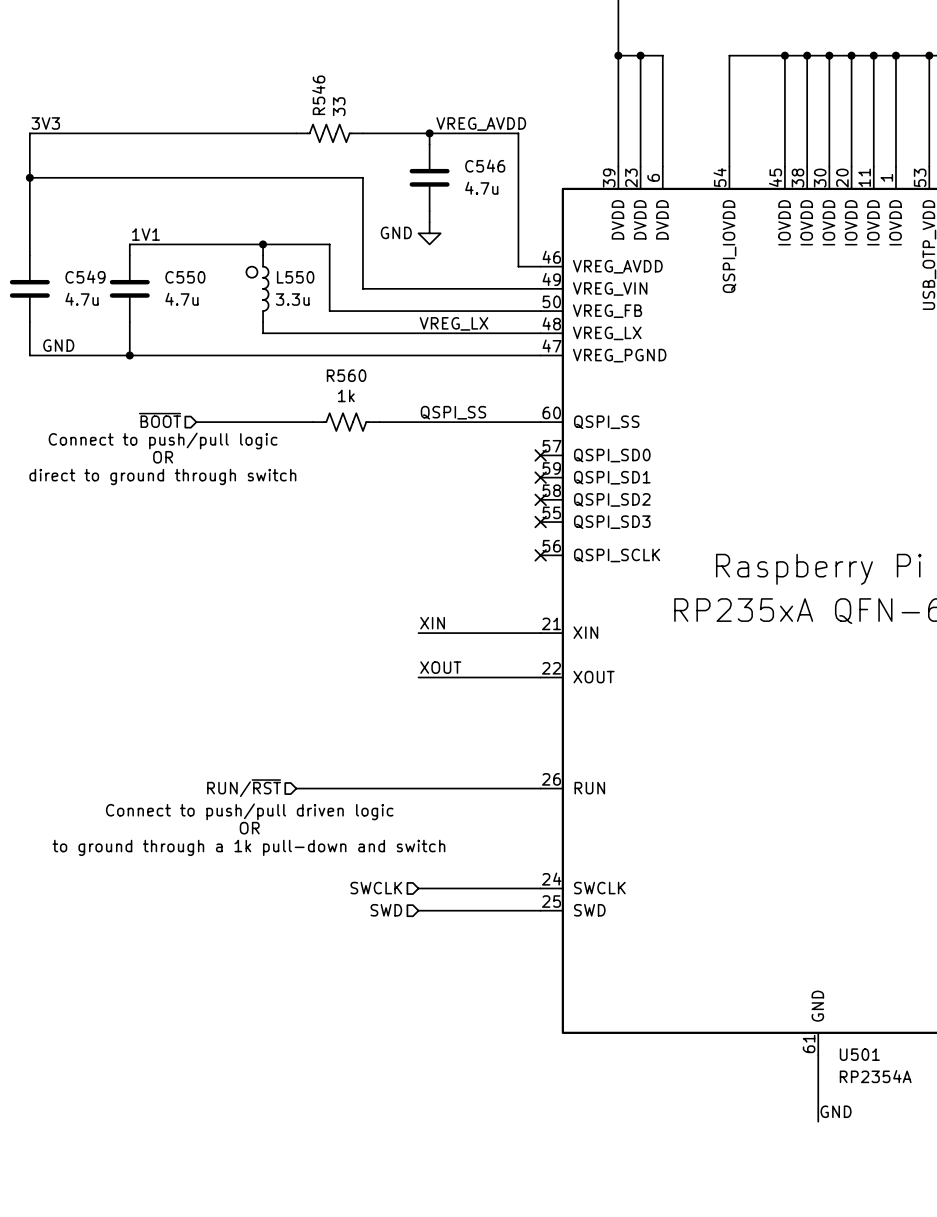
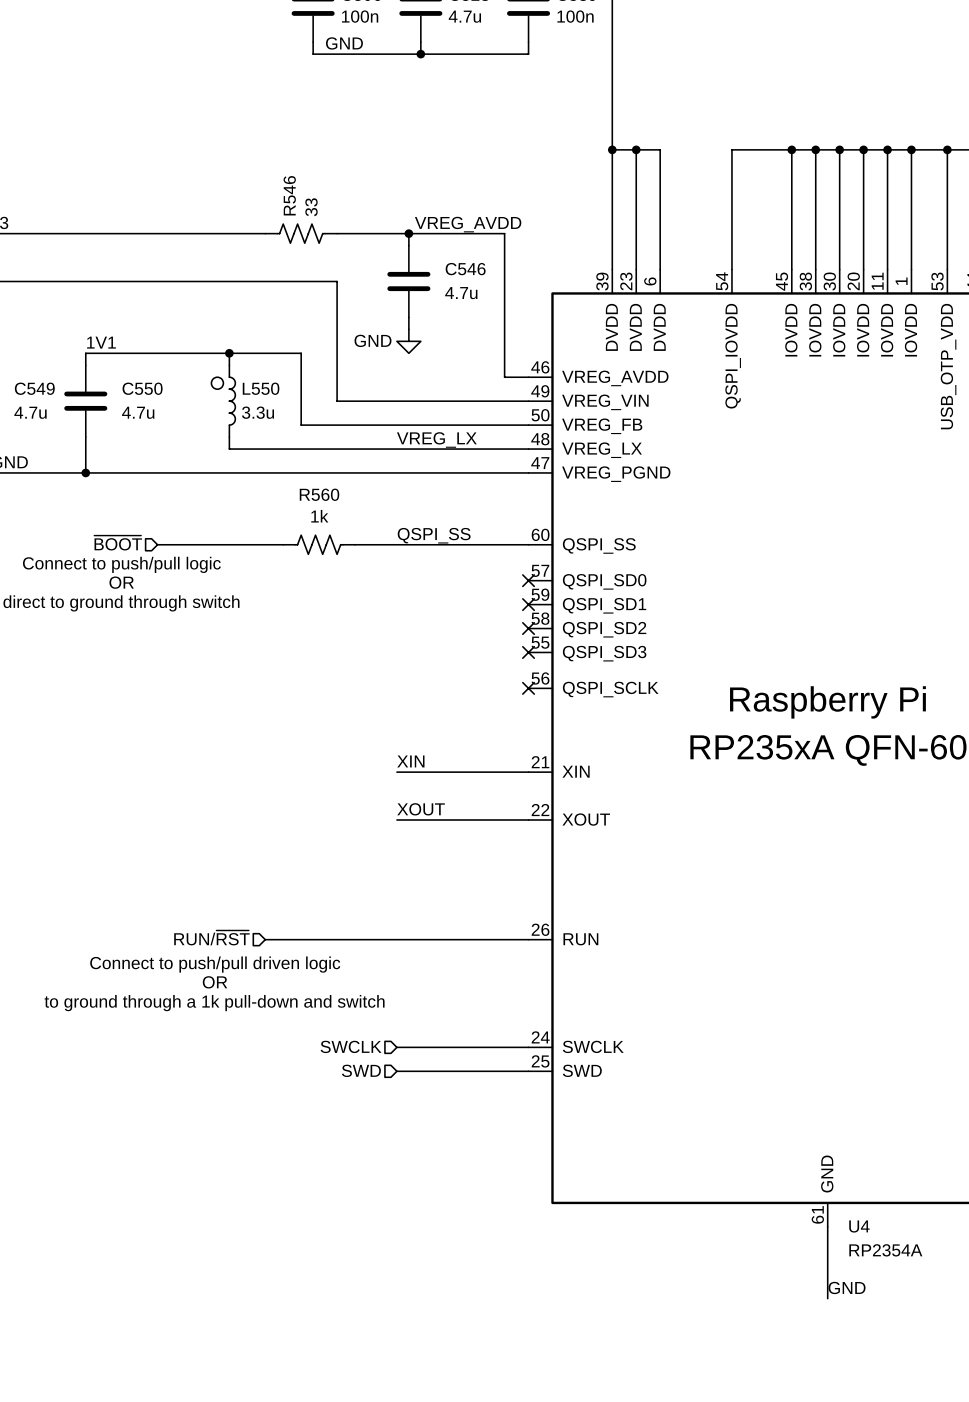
U501 name: U501 (859, 1054) -> U4 (859, 1226)

